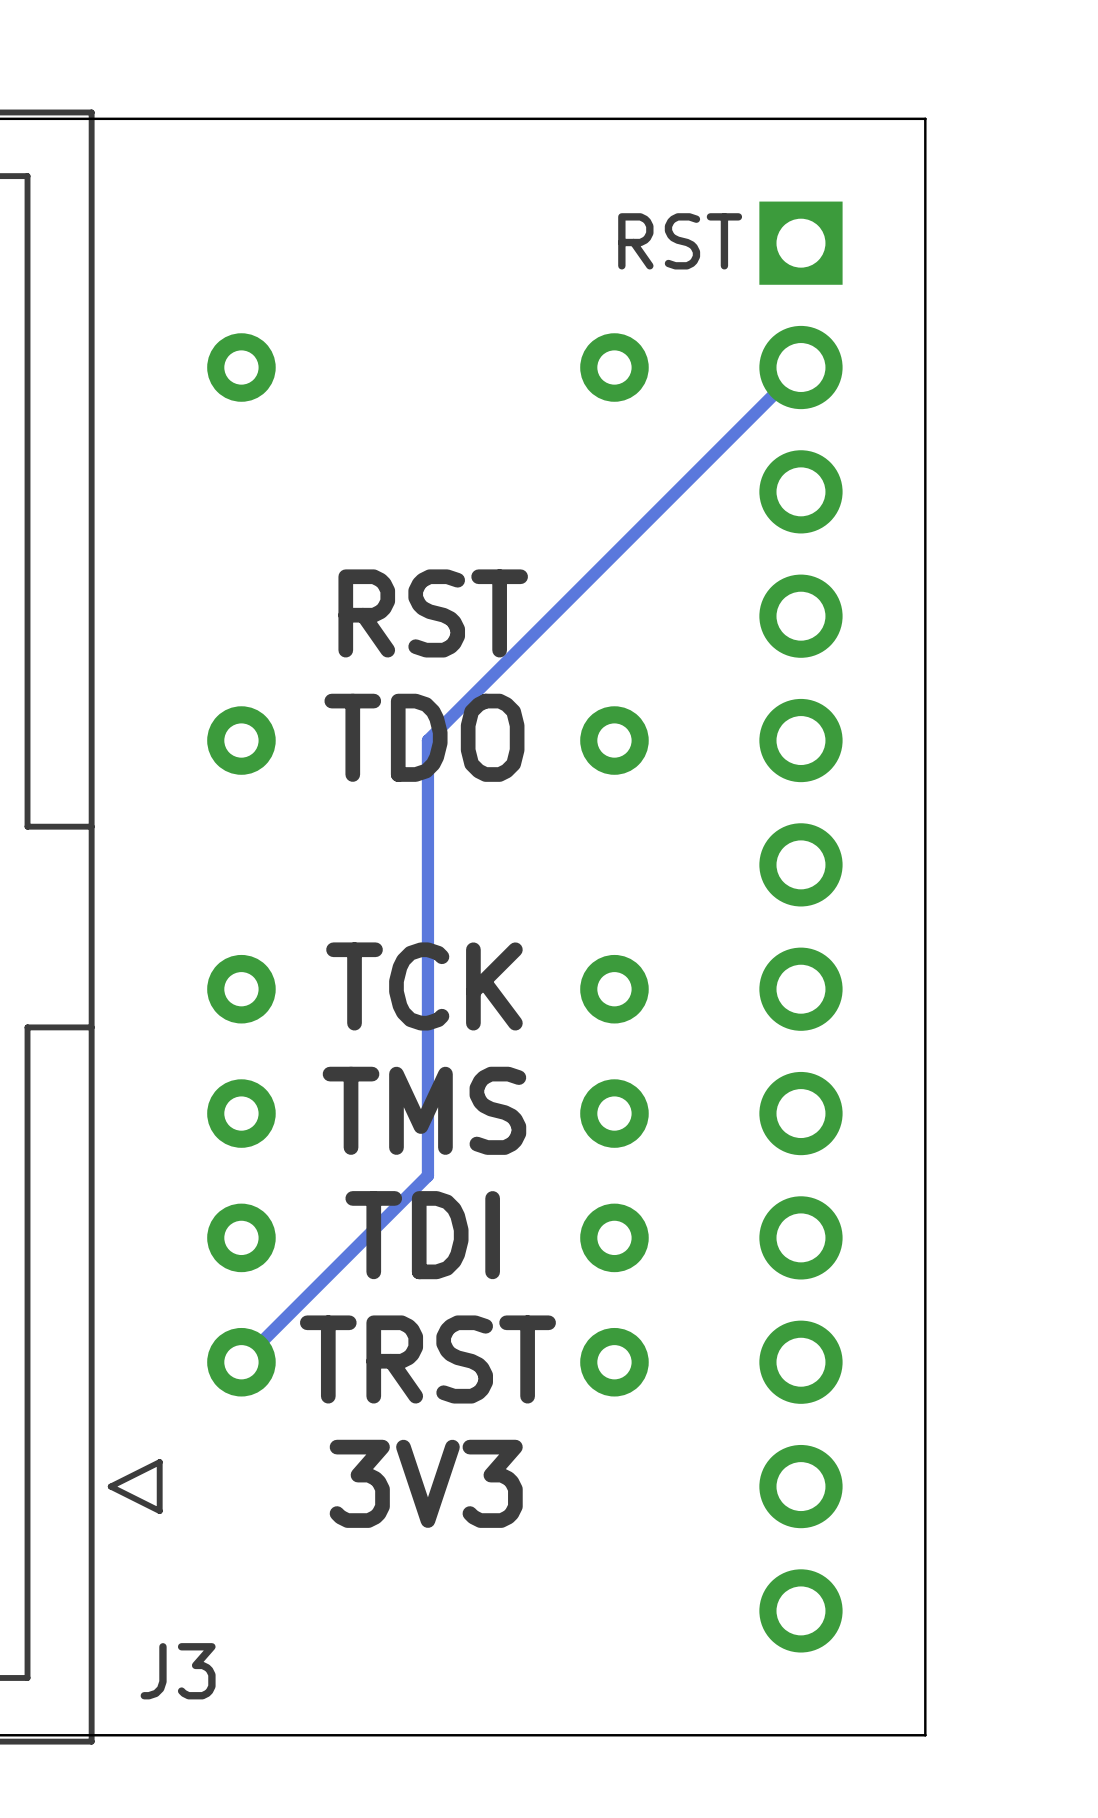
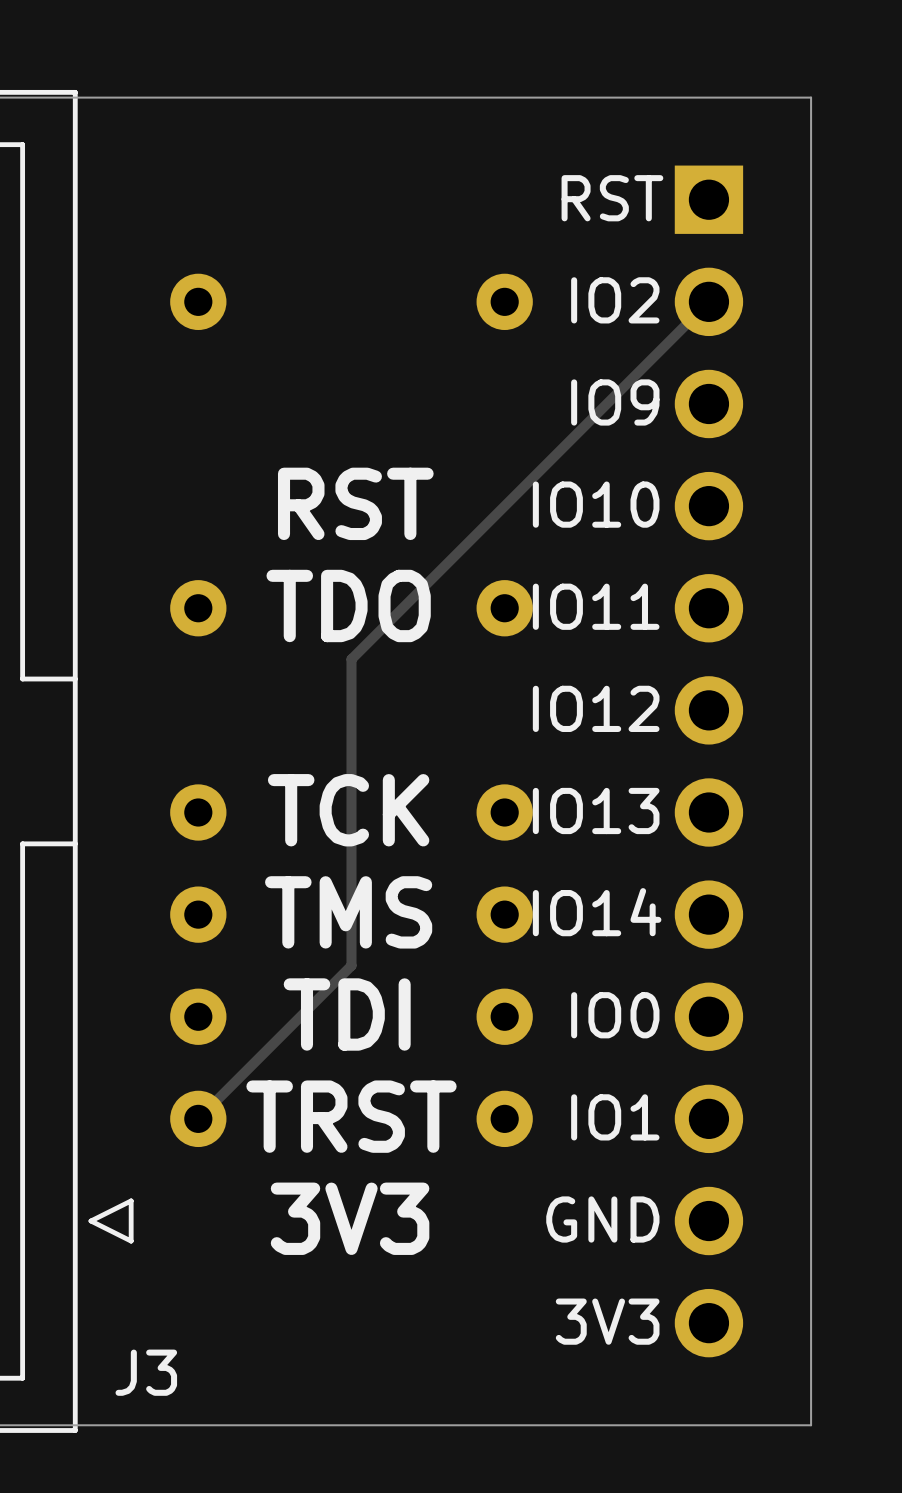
board edge: (925, 118) (925, 1735) -> (760, 97) (811, 97) (811, 1425) (760, 1425)
text position: RST (680, 241) -> RST (612, 198)
text: none -> IO2 (615, 300)
track: (800, 367) (427, 740) (427, 802) -> (708, 301) (351, 659)
text: none -> IO9 (615, 402)
text: none -> IO10 (596, 504)
text: none -> IO11 (596, 606)
text: none -> IO12 (596, 708)
part position: (800, 927) -> (708, 761)
text: none -> IO13 (596, 810)
text: none -> IO14 (597, 912)
text: none -> IO0 (615, 1015)
text: none -> IO1 (615, 1117)
text: none -> GND (602, 1219)
text: none -> 3V3 (607, 1321)

